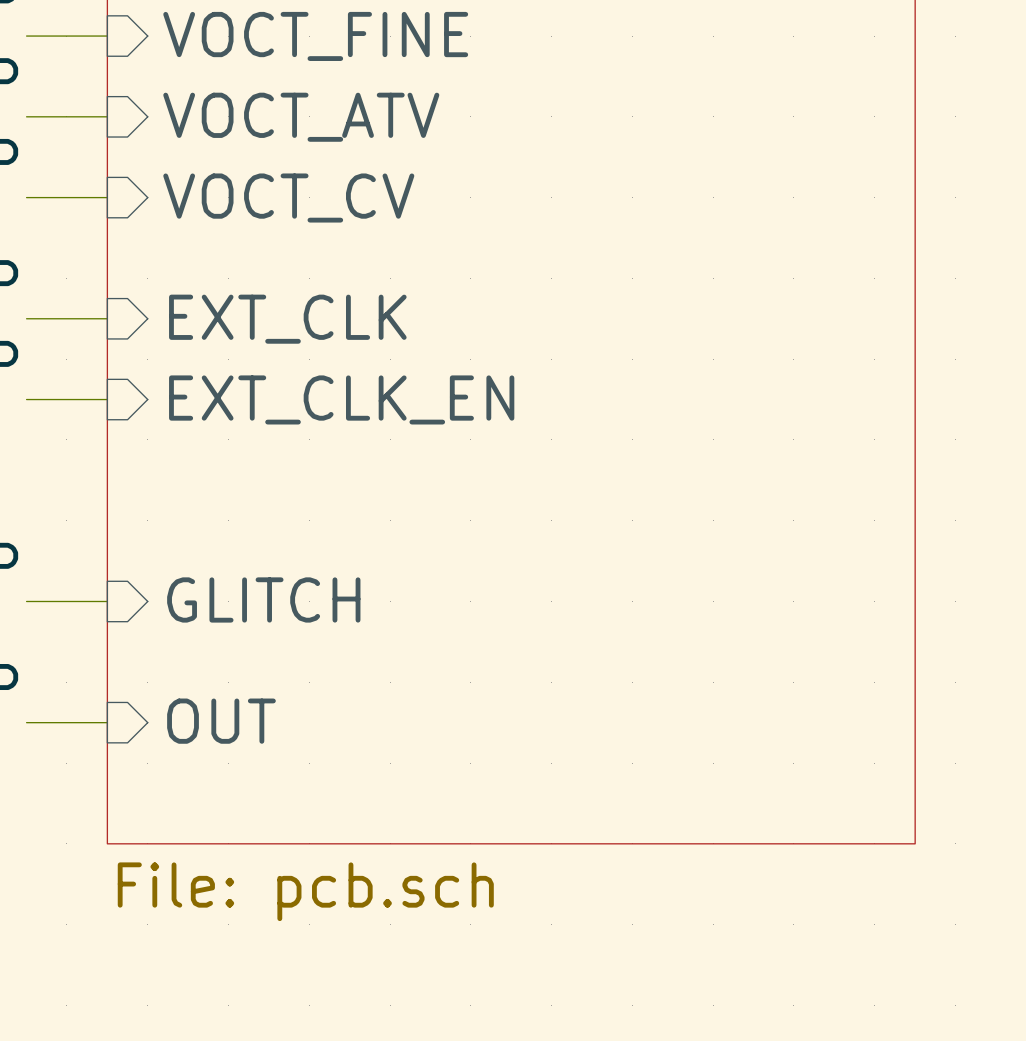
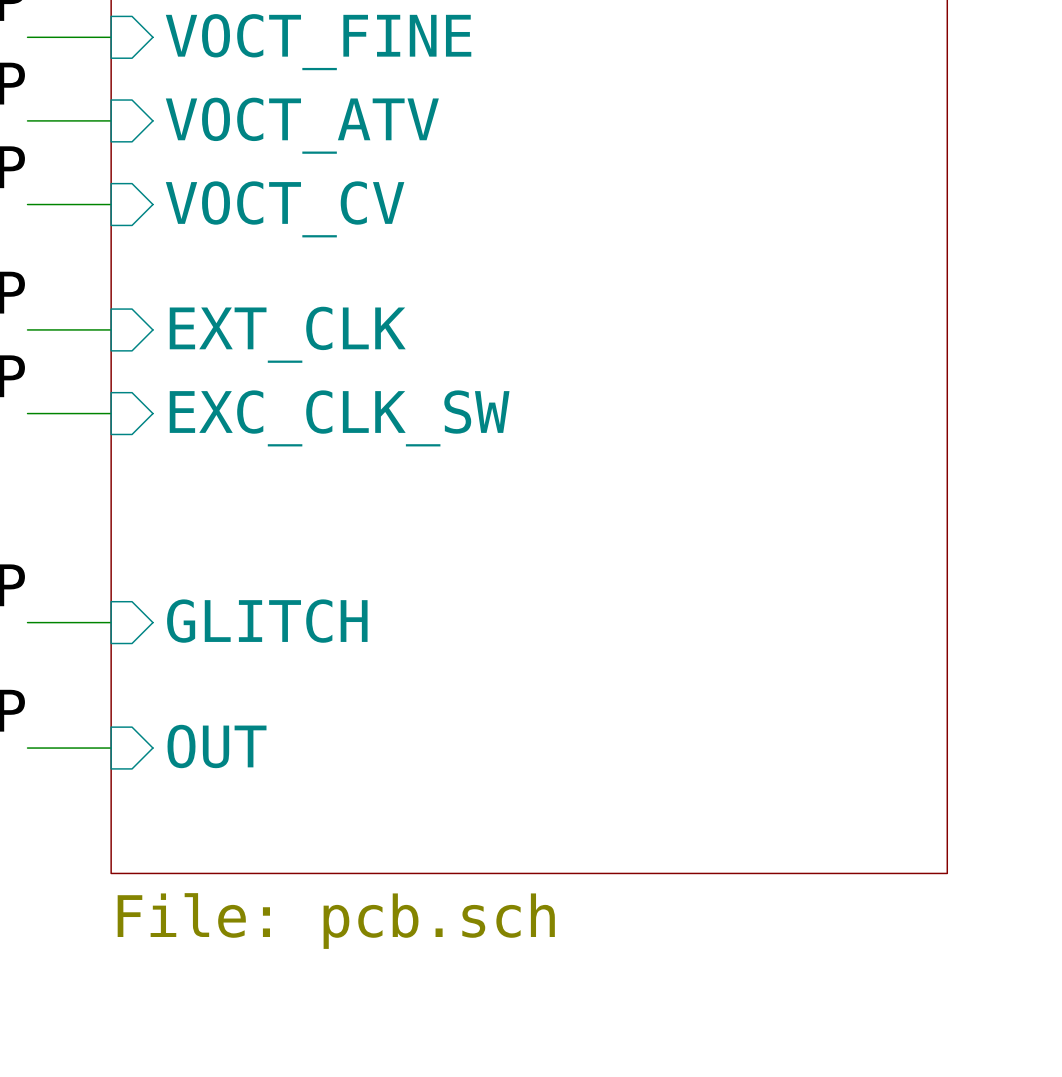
sheet pin: EXT_CLK_EN (341, 399) -> EXC_CLK_SW (339, 418)

